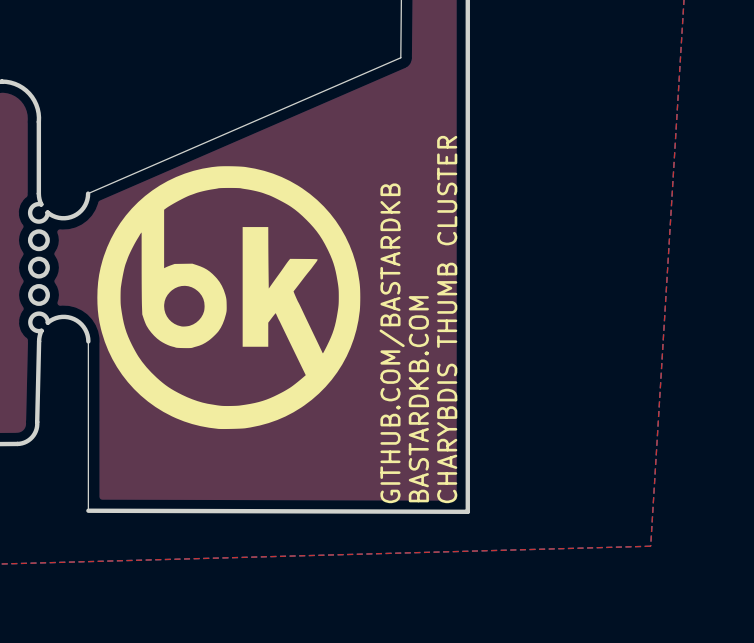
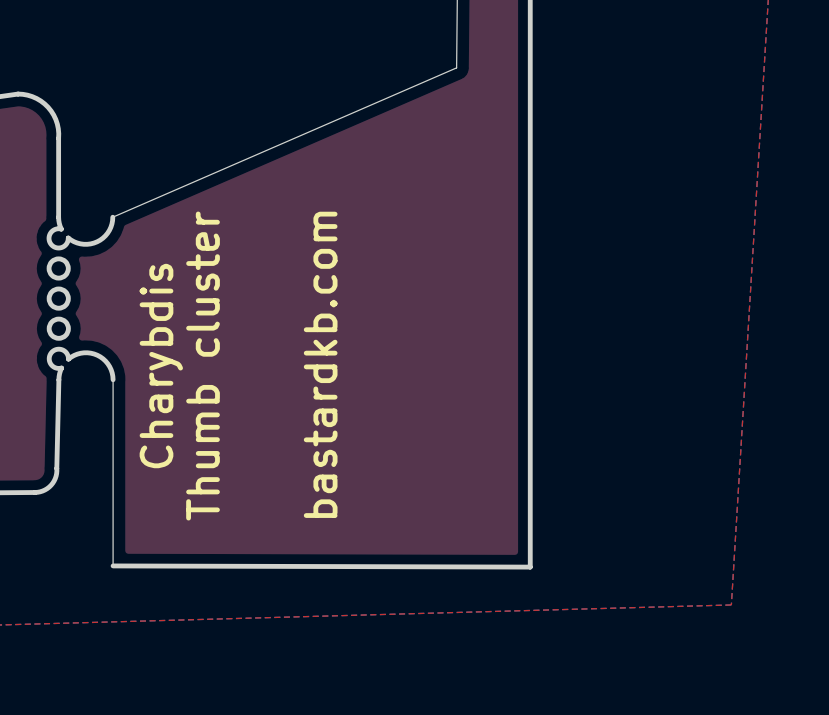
drawing: [97, 166, 361, 430] -> none
text: CHARYBDIS THUMB CLUSTER (447, 319) -> none
text: none -> bastardkb.com (320, 364)
text: none -> Charybdis (161, 366)
text: none -> Thumb cluster (203, 366)
text: GITHUB.COM/BASTARDKB (392, 343) -> none
text: BASTARDKB.COM (418, 399) -> none

